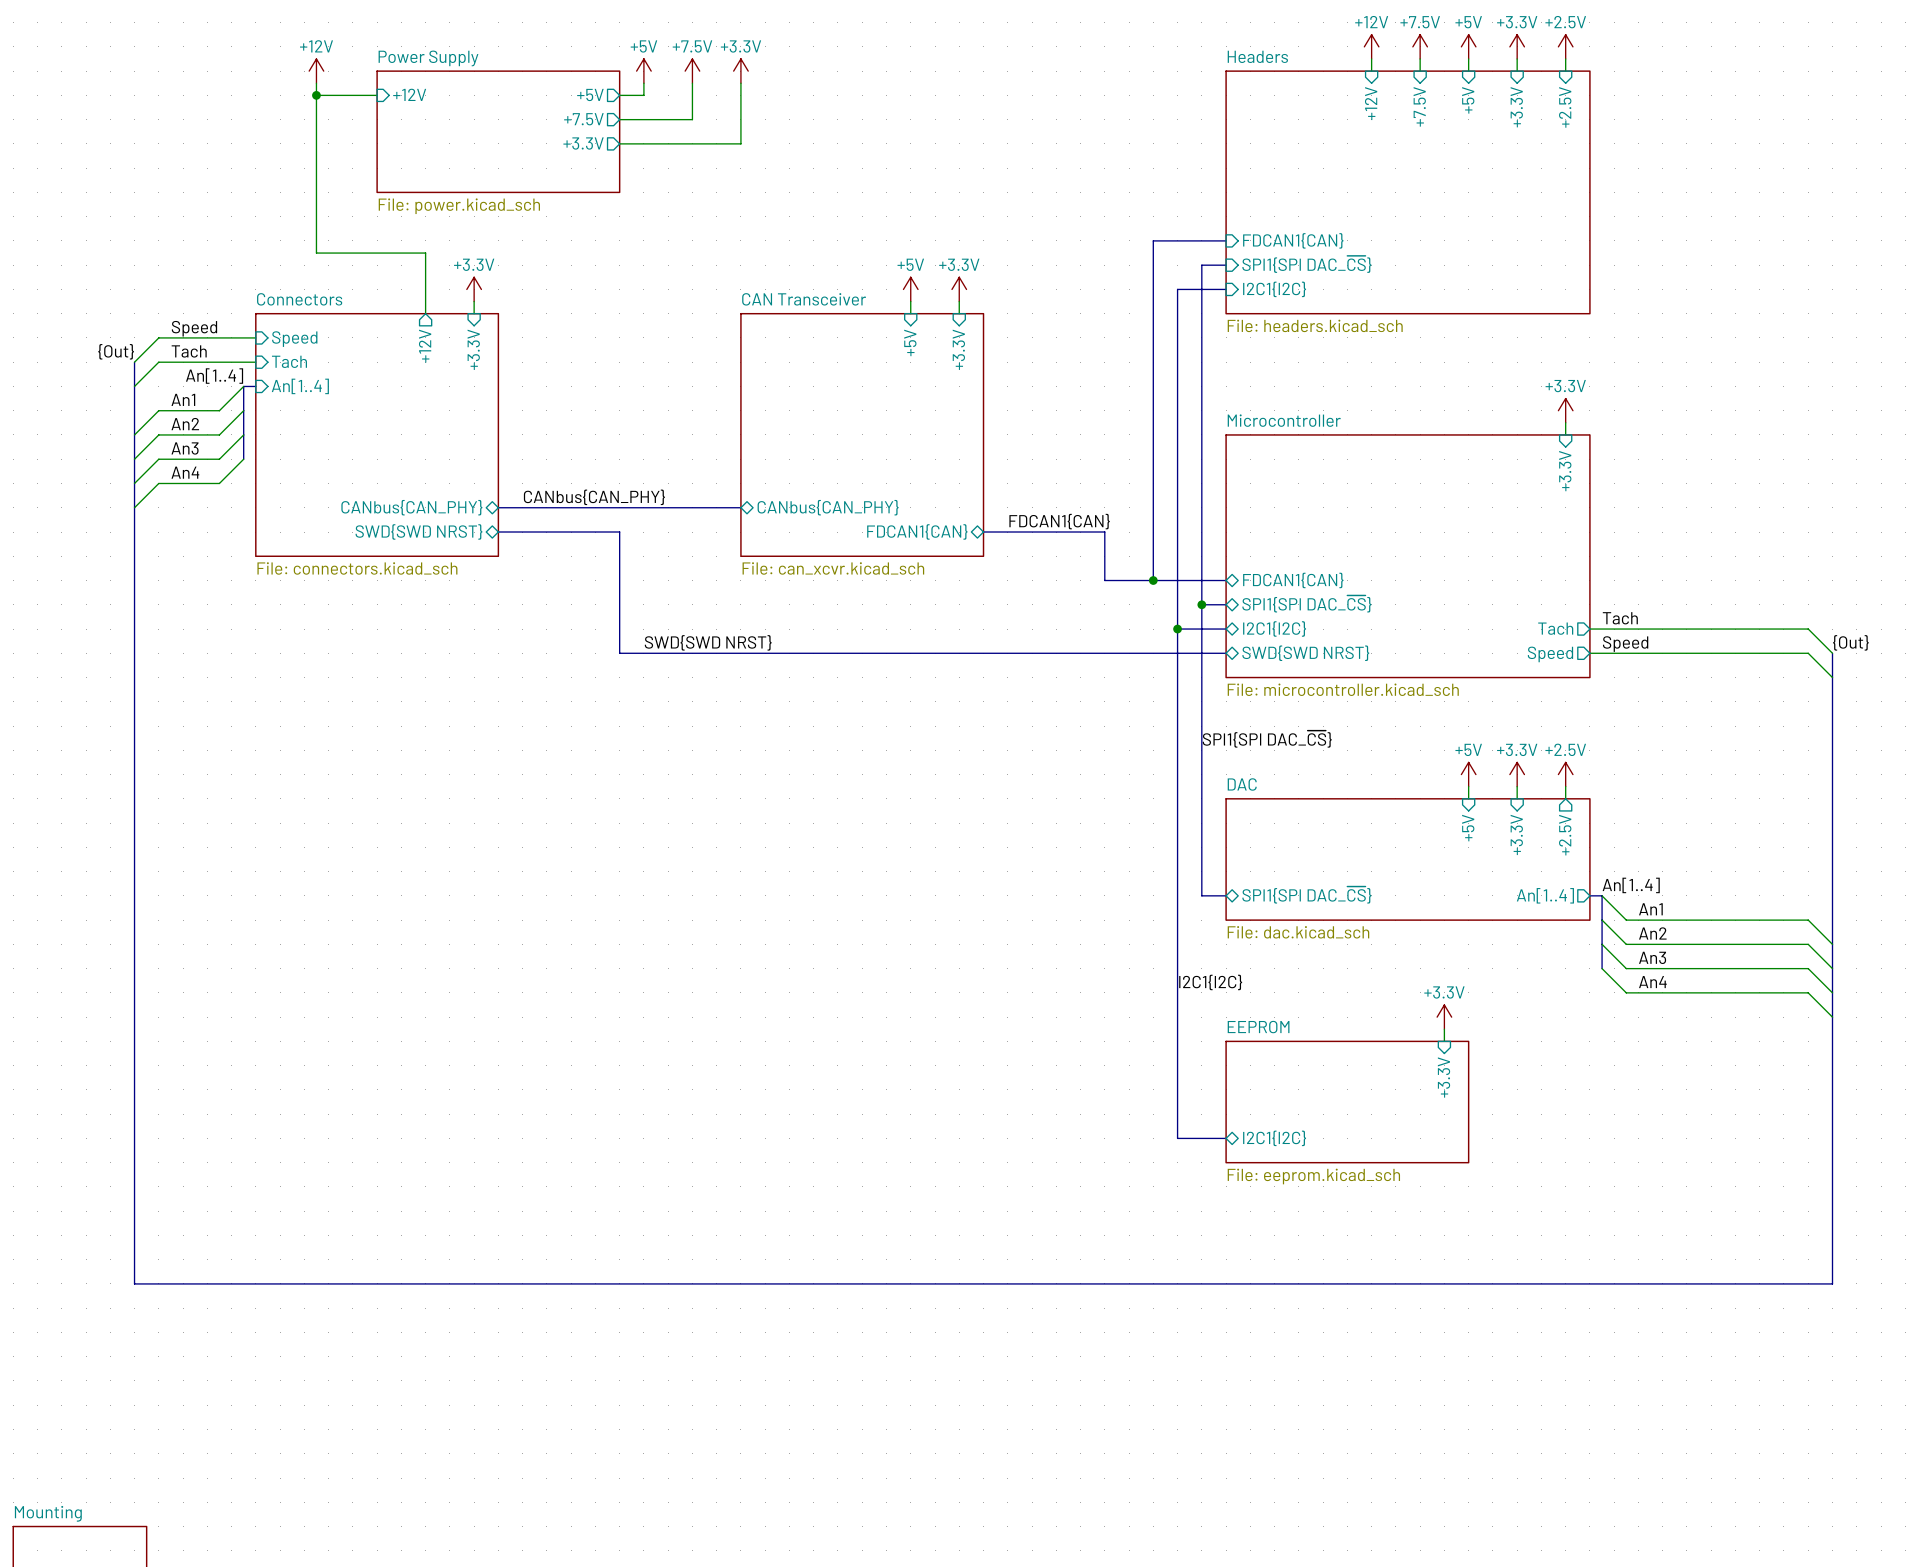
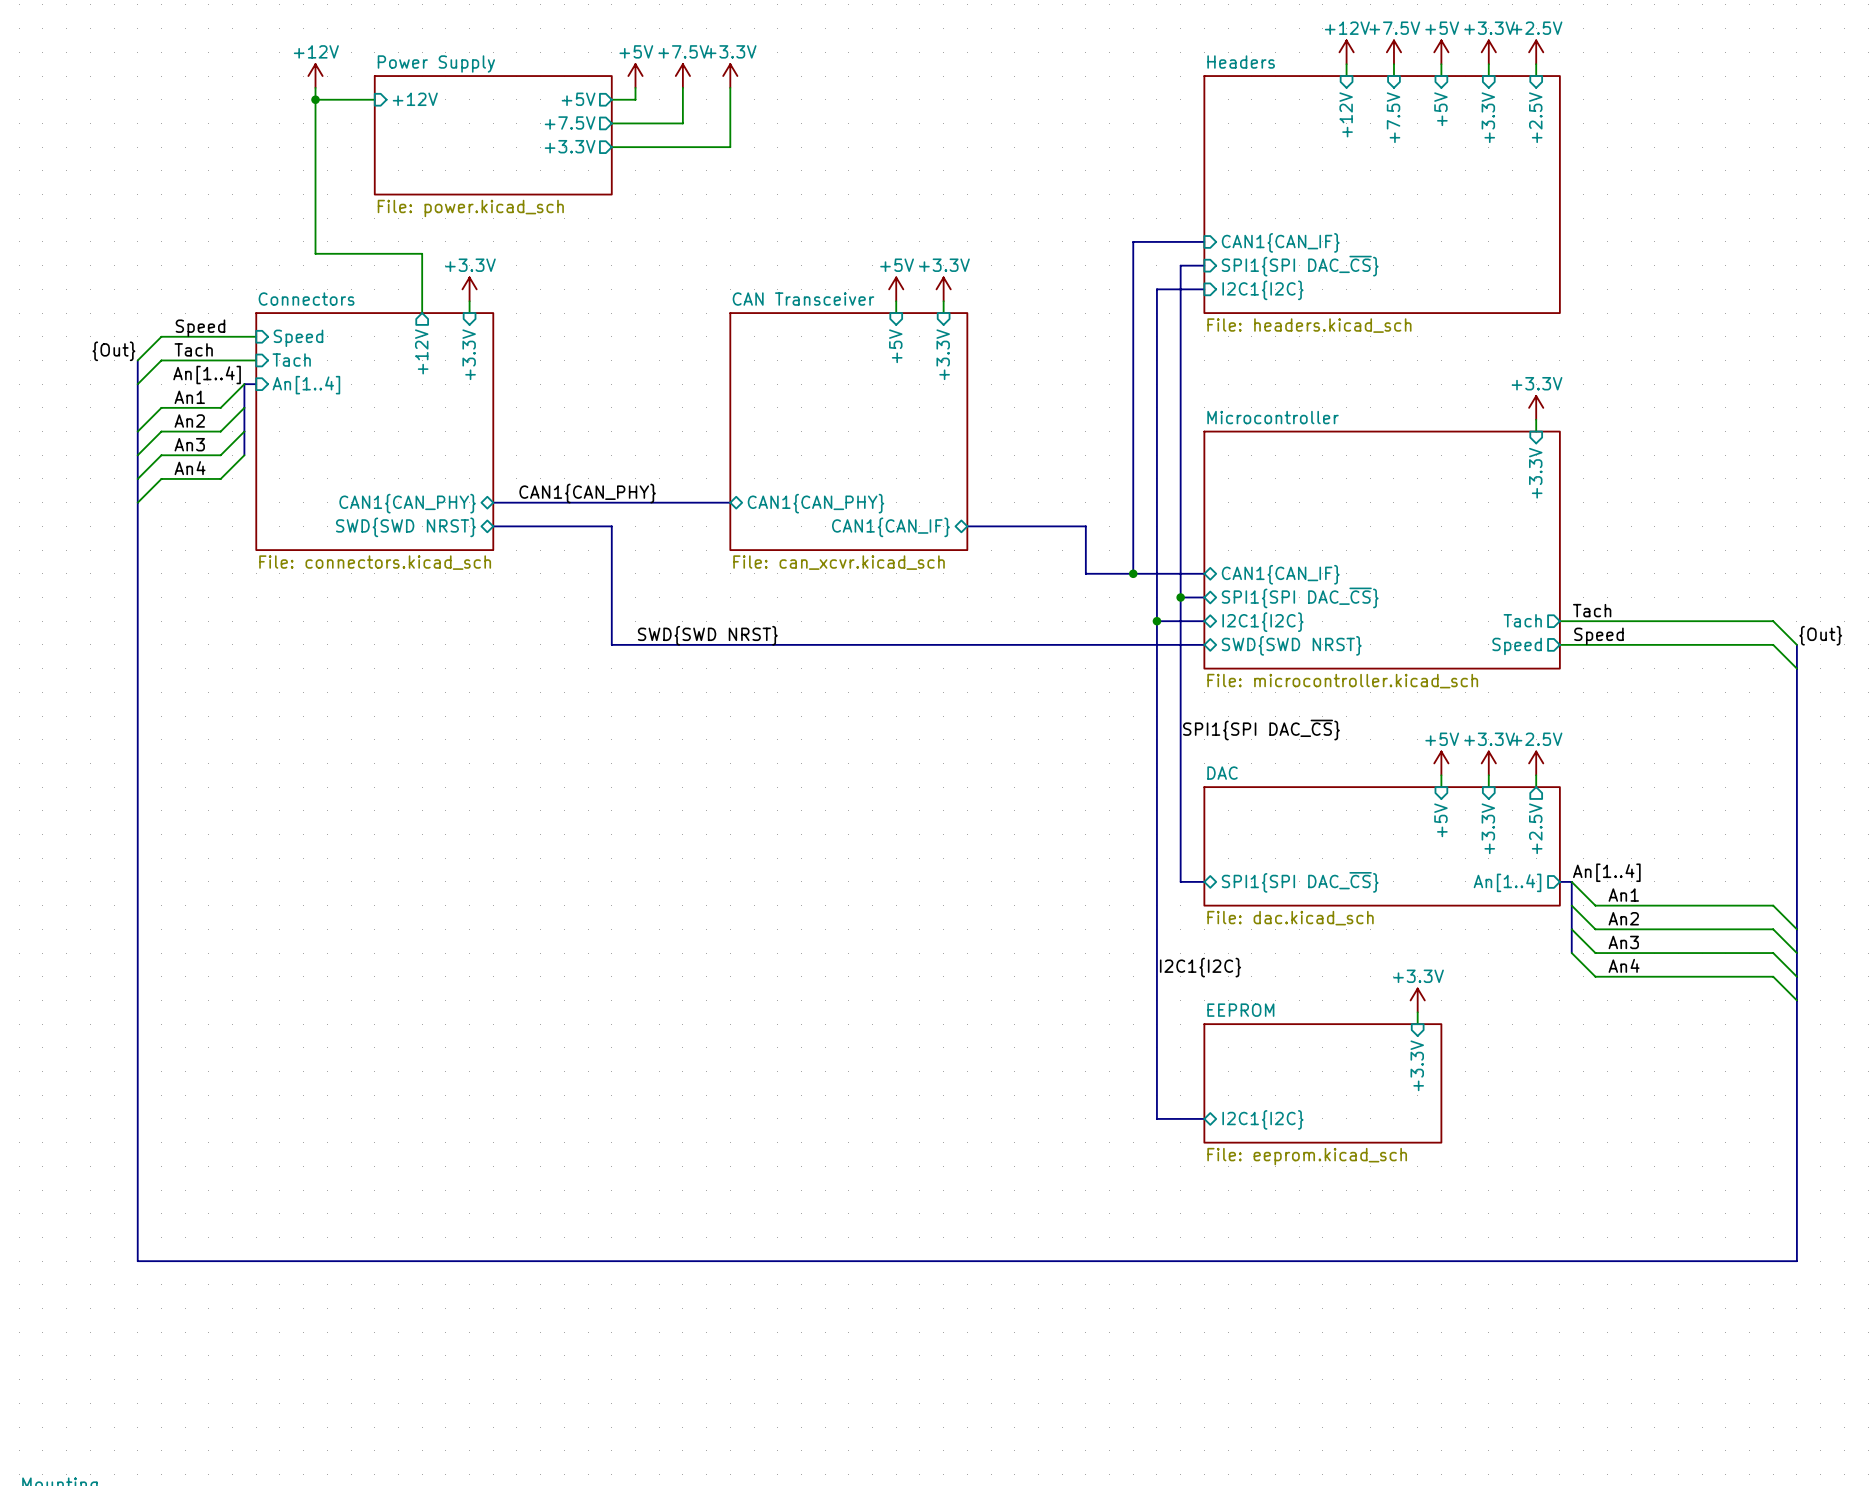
sheet pin: FDCAN1{CAN} (1293, 240) -> CAN1{CAN_IF} (1280, 242)
label: CANbus{CAN_PHY} (594, 497) -> CAN1{CAN_PHY} (587, 493)
sheet pin: CANbus{CAN_PHY} (411, 507) -> CAN1{CAN_PHY} (407, 503)
sheet pin: CANbus{CAN_PHY} (828, 507) -> CAN1{CAN_PHY} (815, 503)
label: FDCAN1{CAN} (1059, 521) -> none
sheet pin: FDCAN1{CAN} (917, 531) -> CAN1{CAN_IF} (890, 527)
sheet pin: FDCAN1{CAN} (1293, 580) -> CAN1{CAN_IF} (1280, 574)

